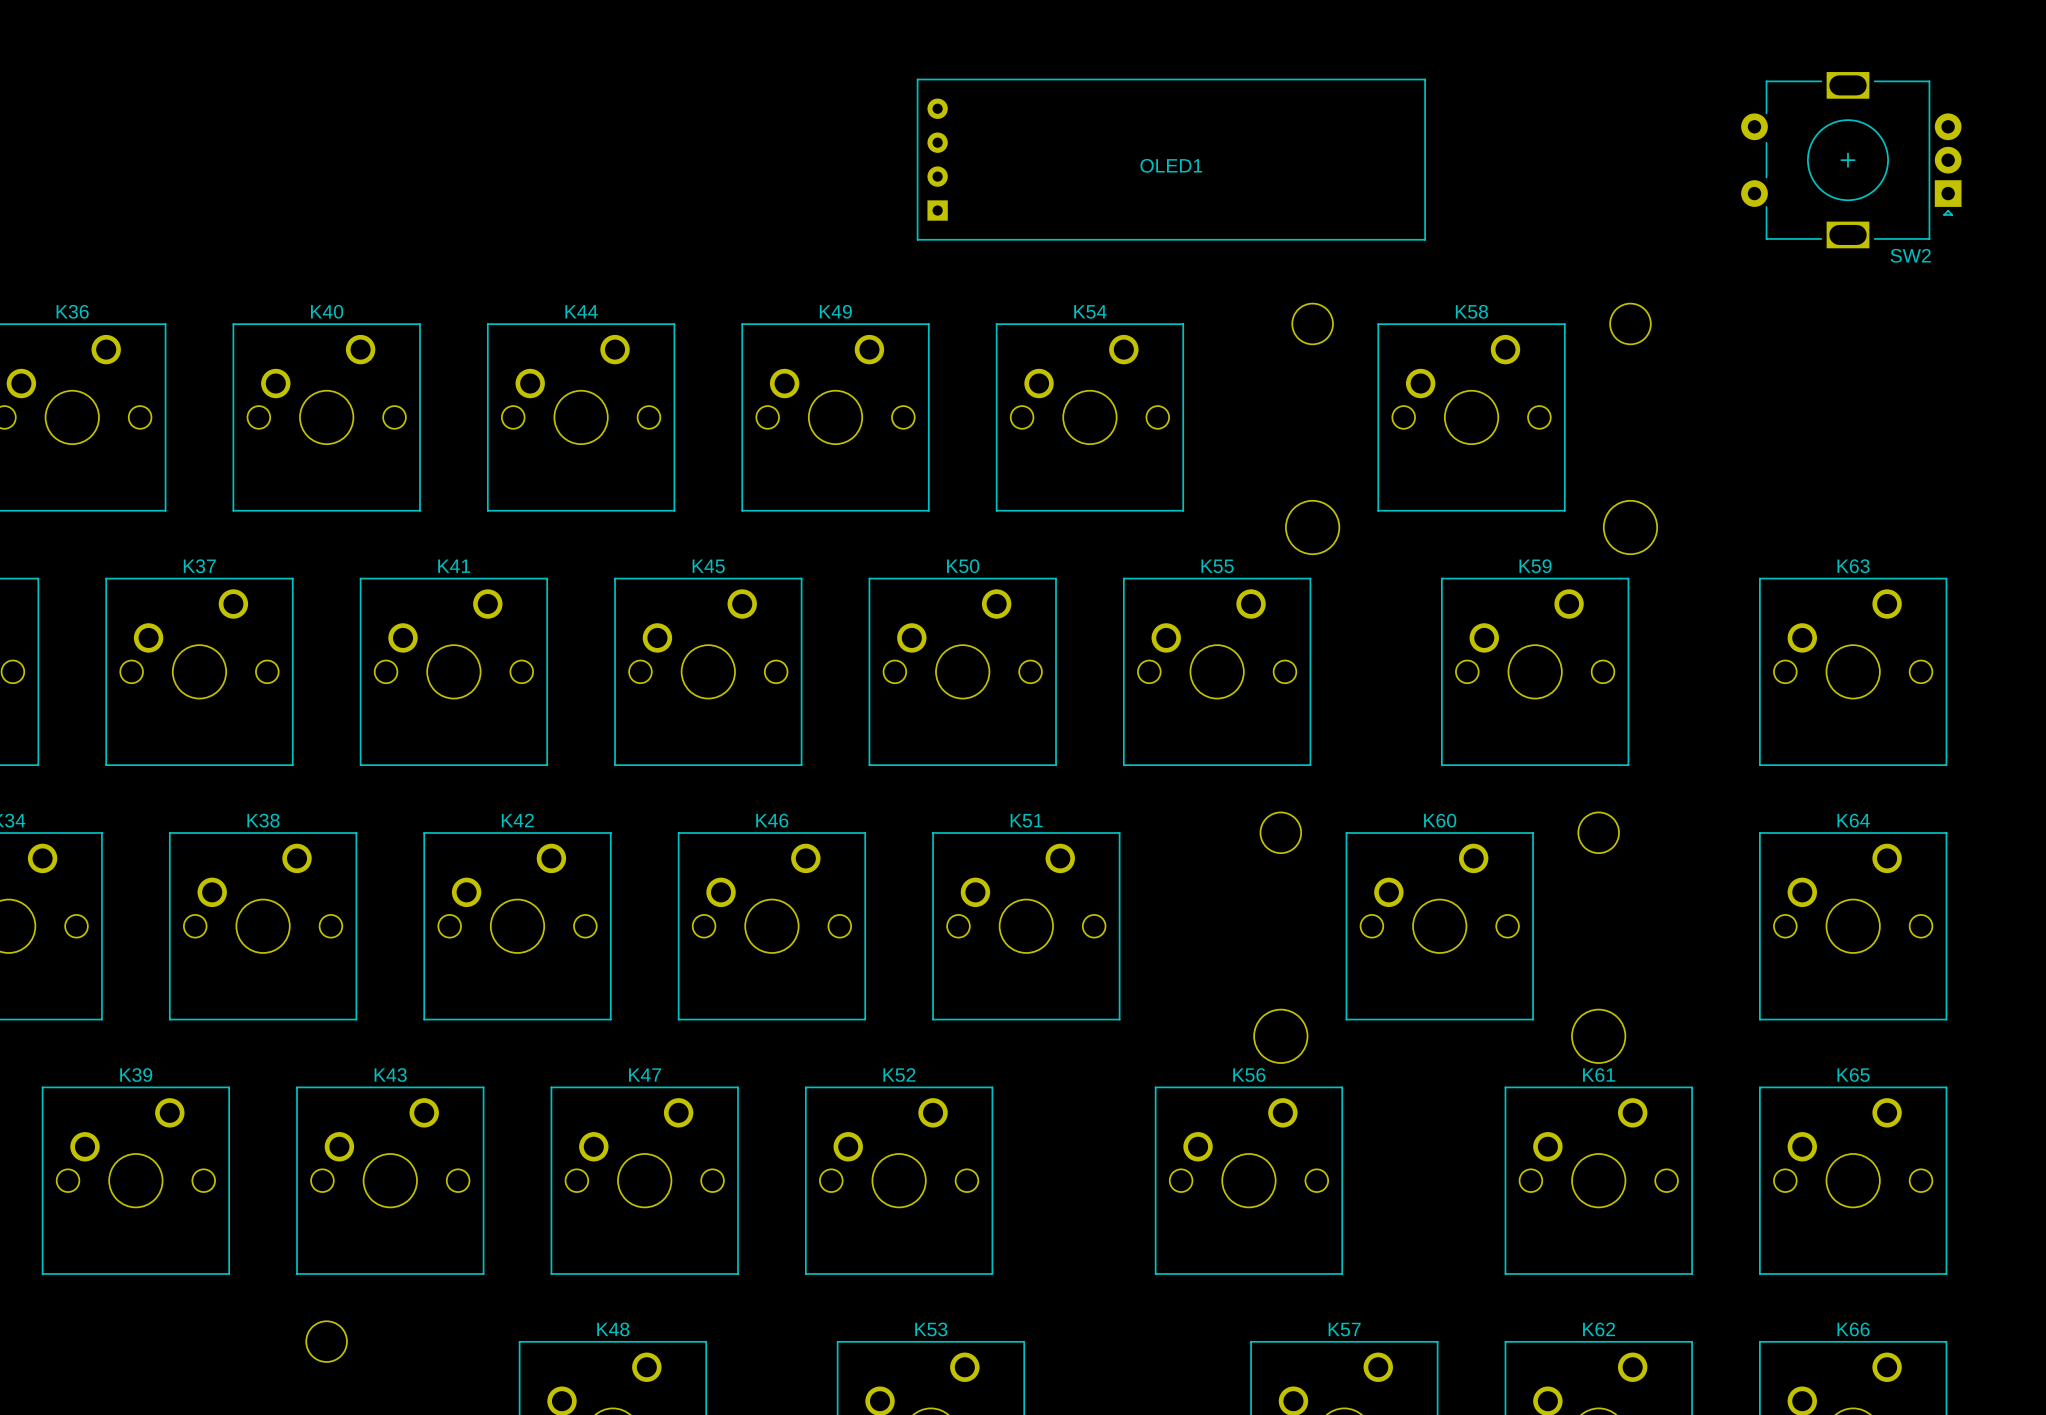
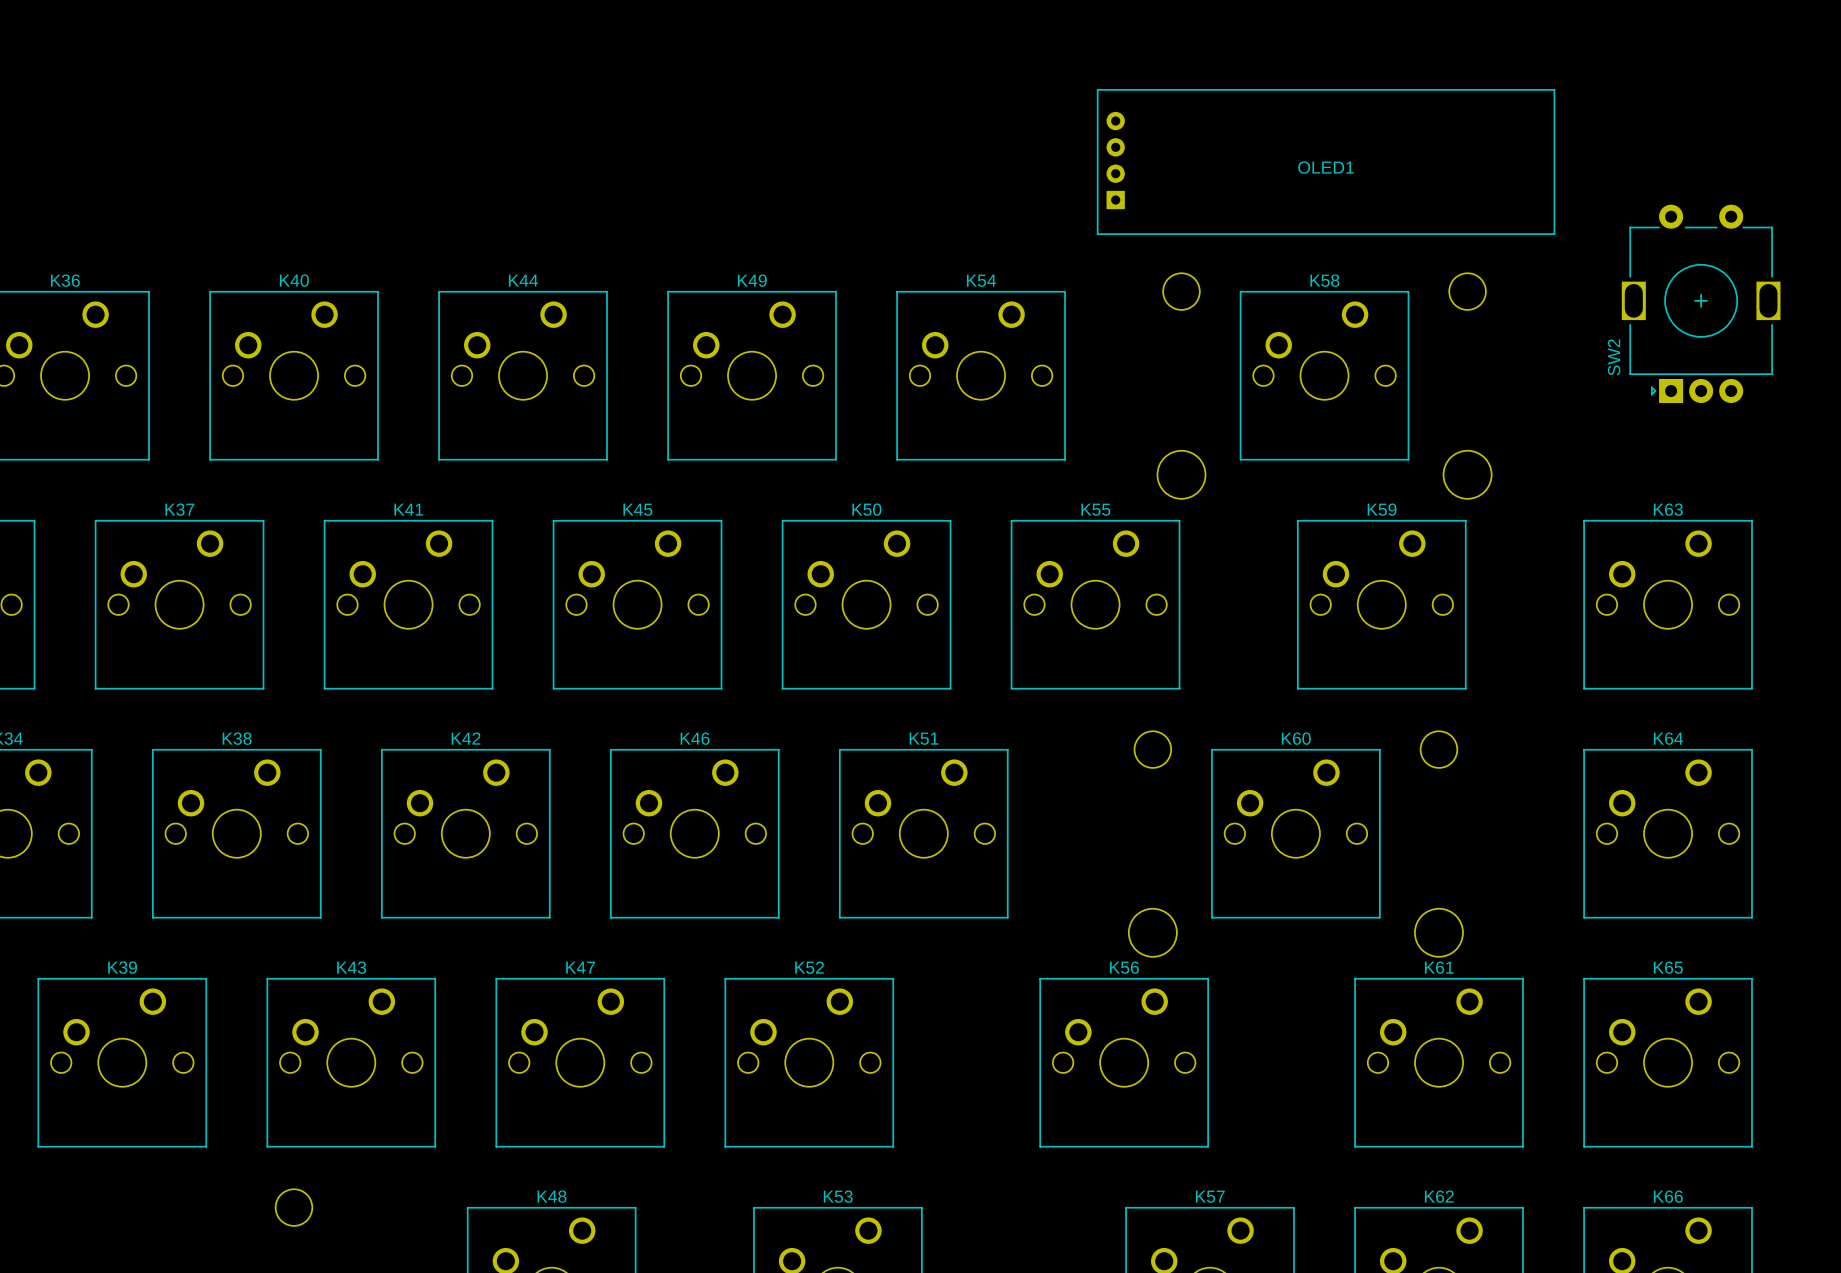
OLED1 footprint: [916, 78, 1426, 241] -> [1096, 89, 1556, 235]
SW2 rotation: 0° (1851, 160) -> 90° clockwise (1701, 303)
SW2 position: (1851, 160) -> (1701, 303)

